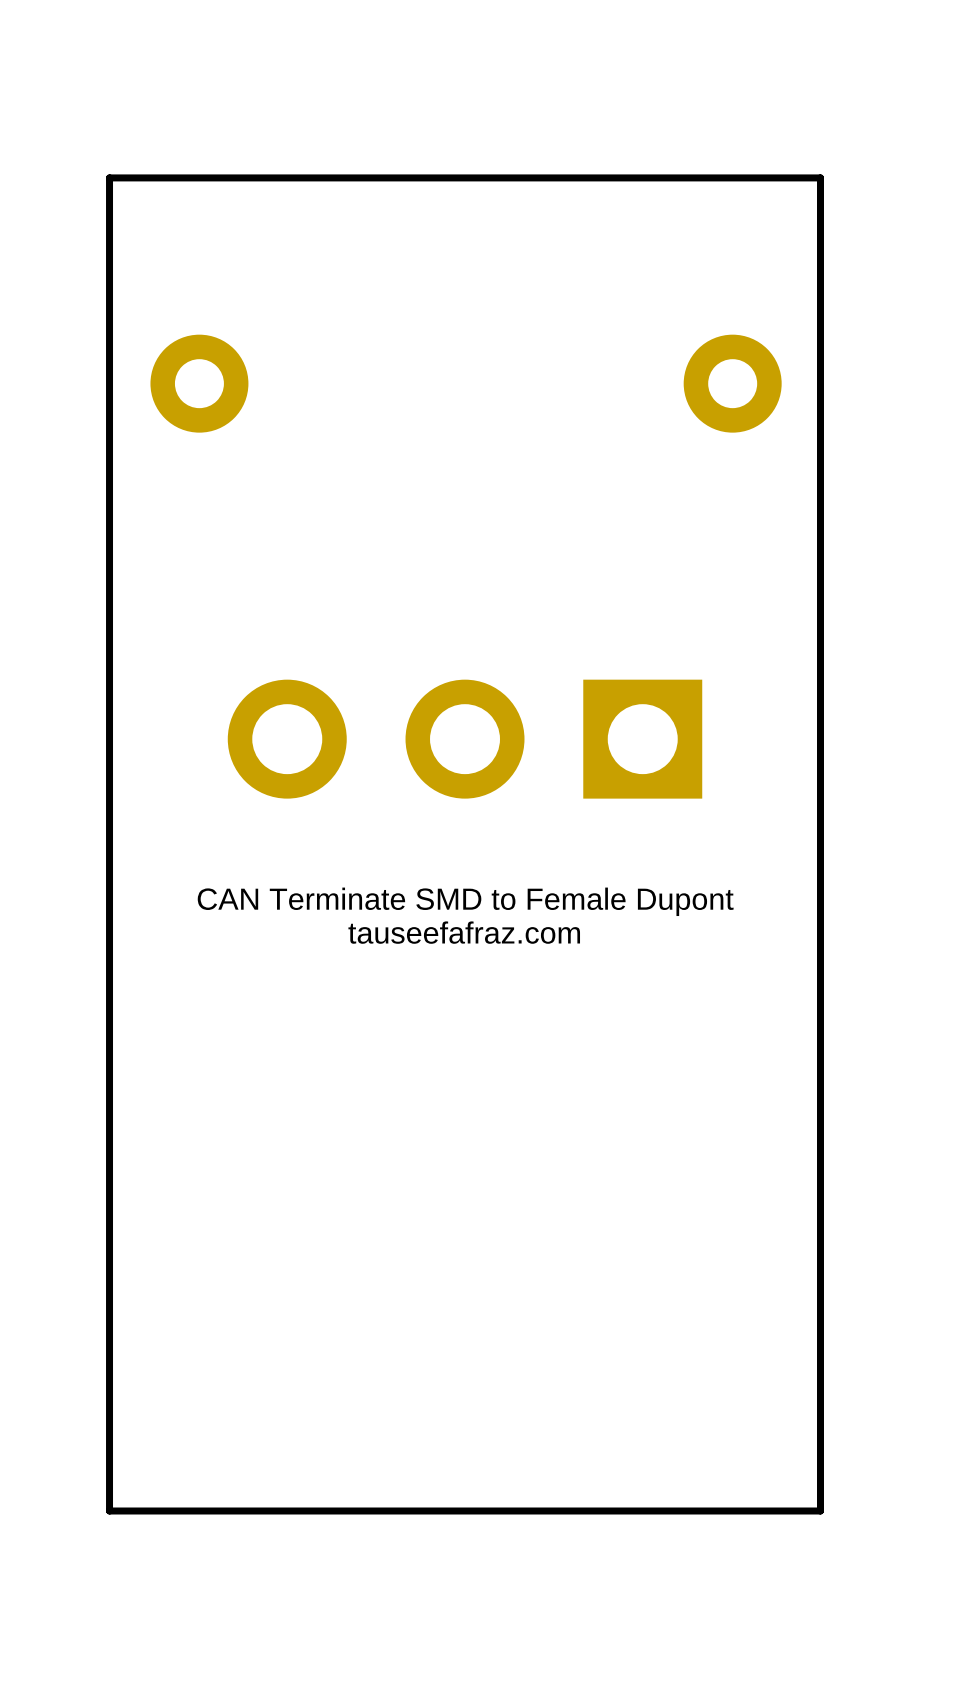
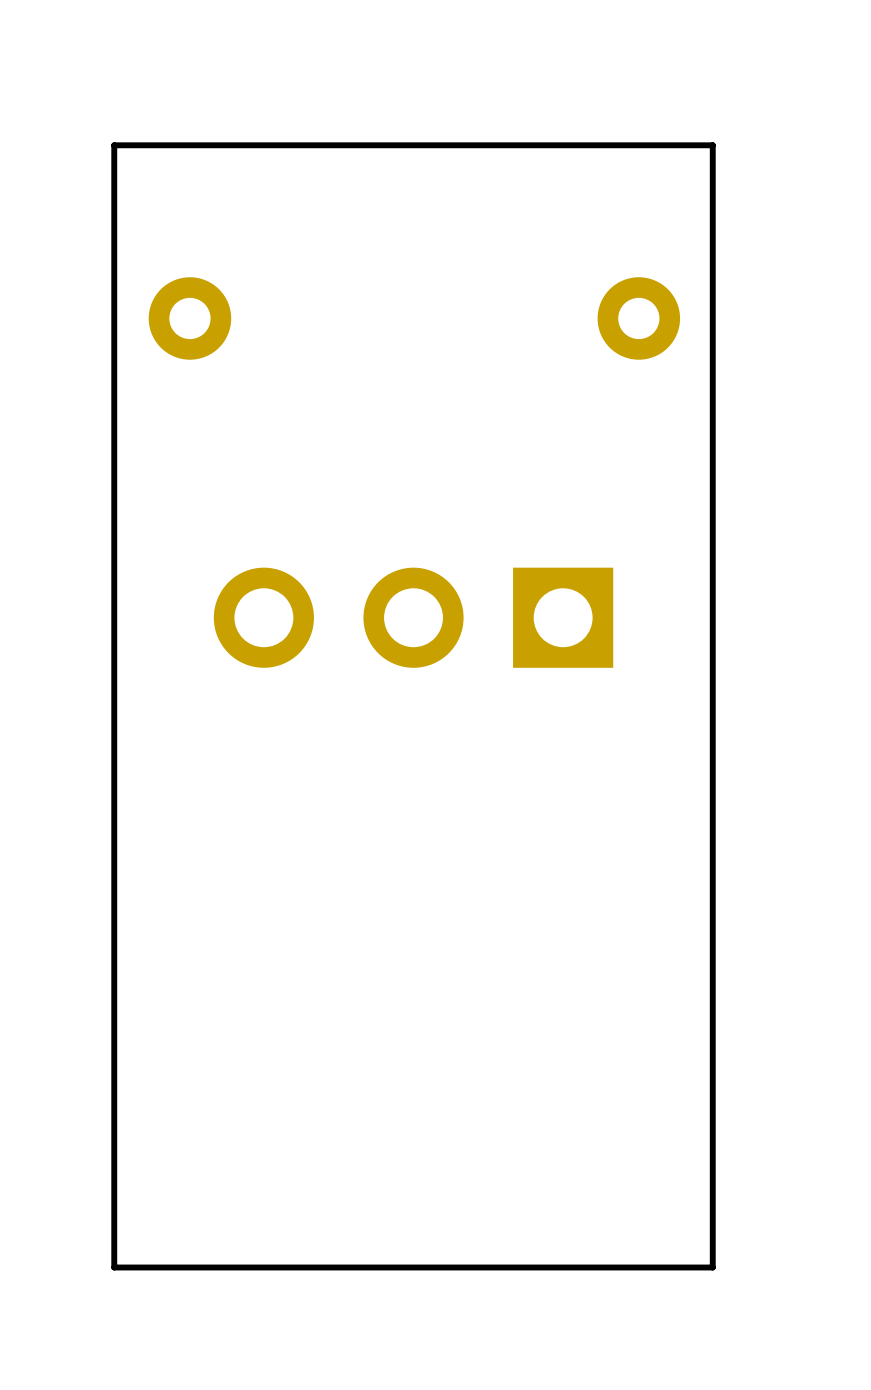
text: CAN Terminate SMD to Female Dupont (465, 901) -> none
text: tauseefafraz.com (464, 932) -> none

